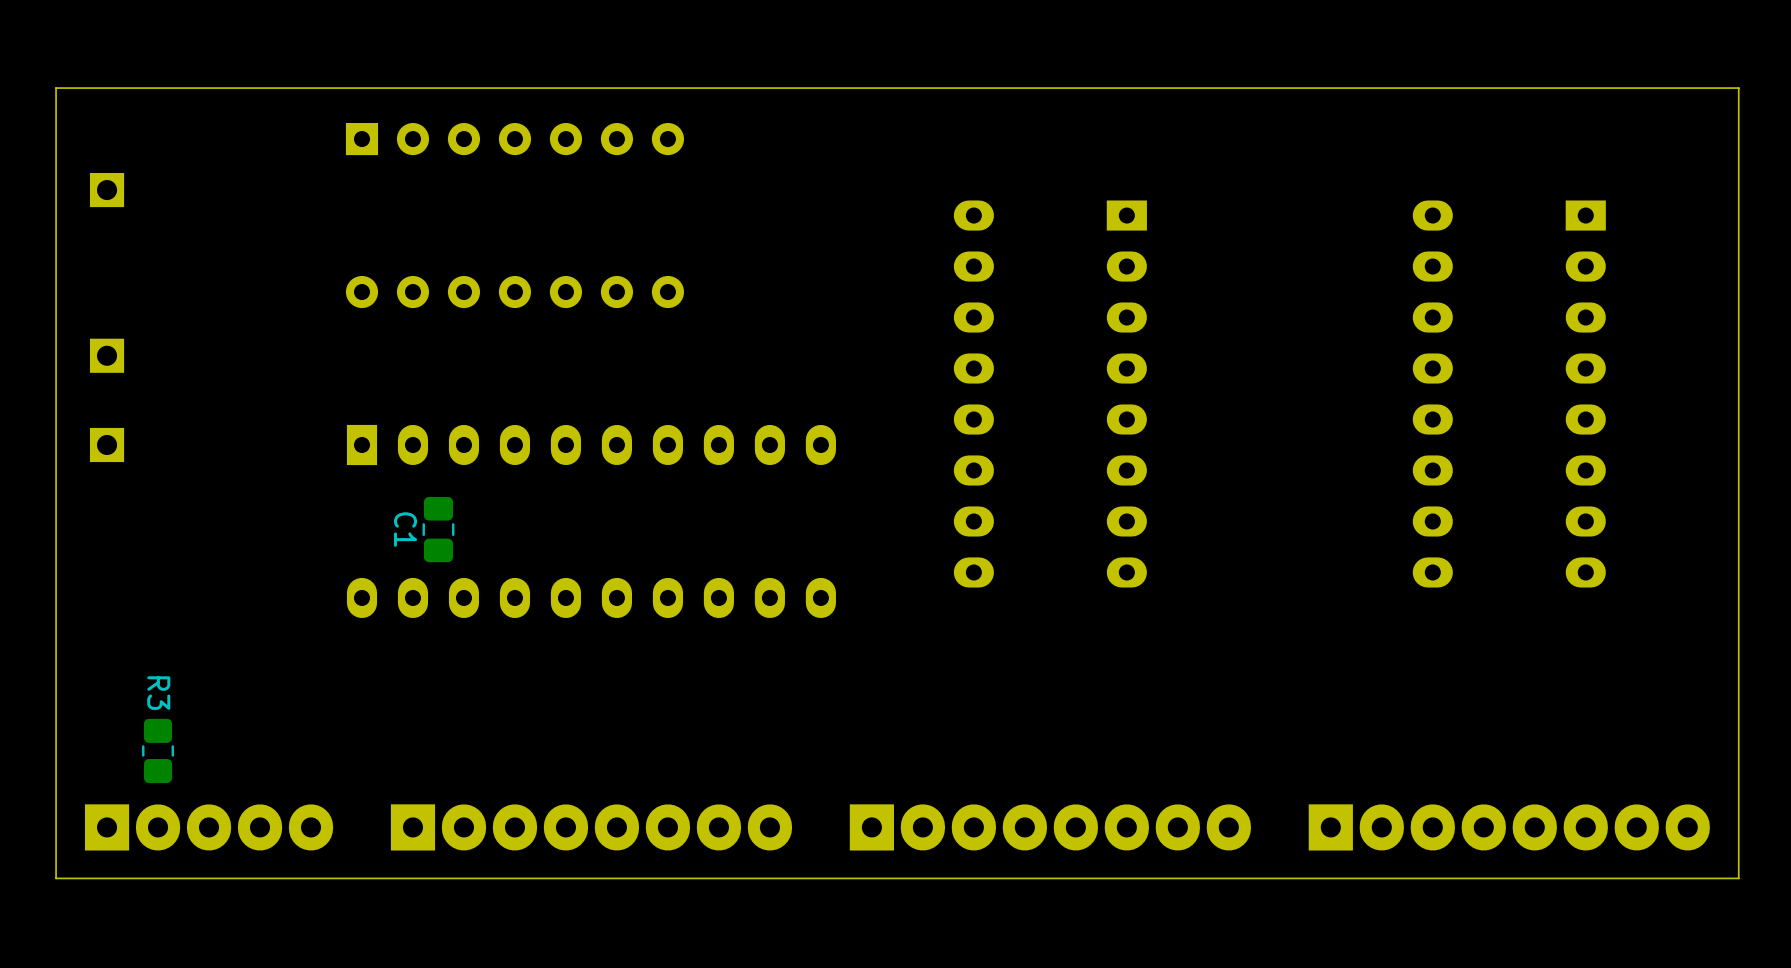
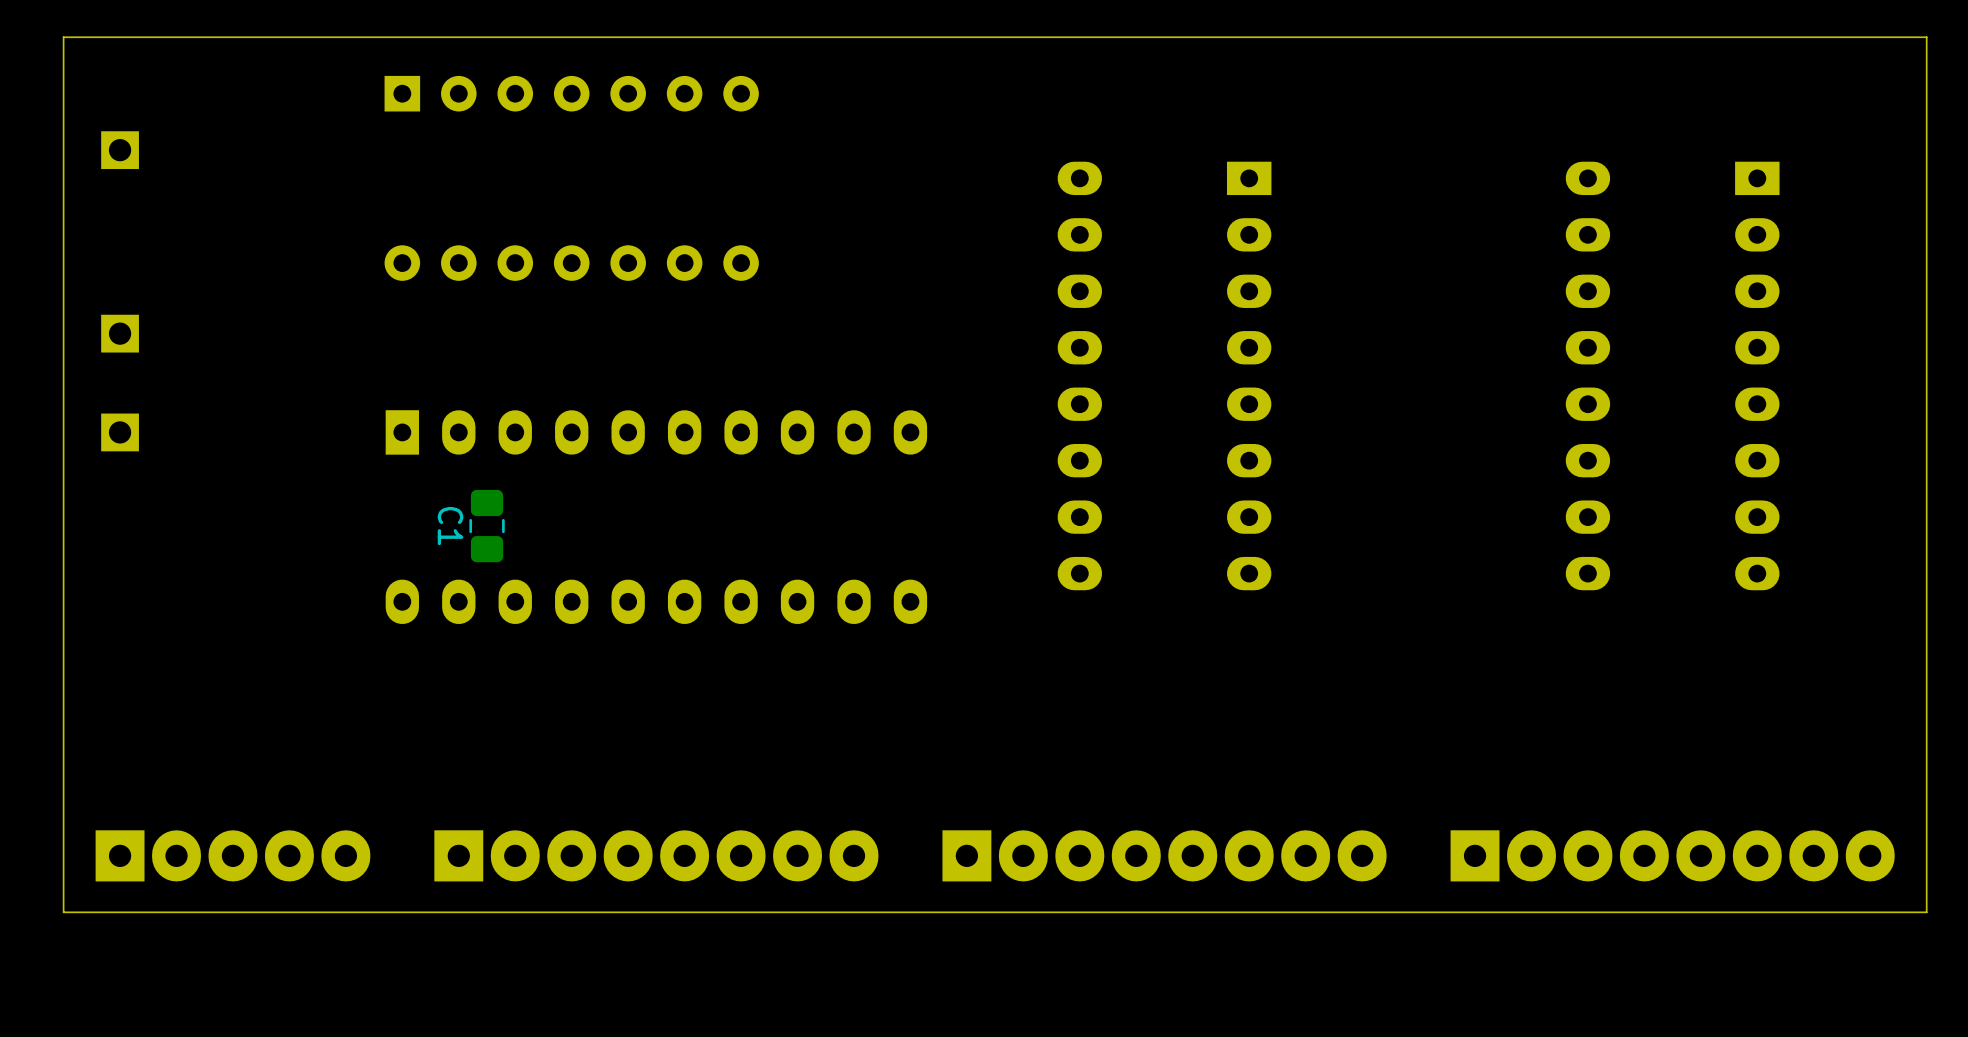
R3: (158, 750) -> none

